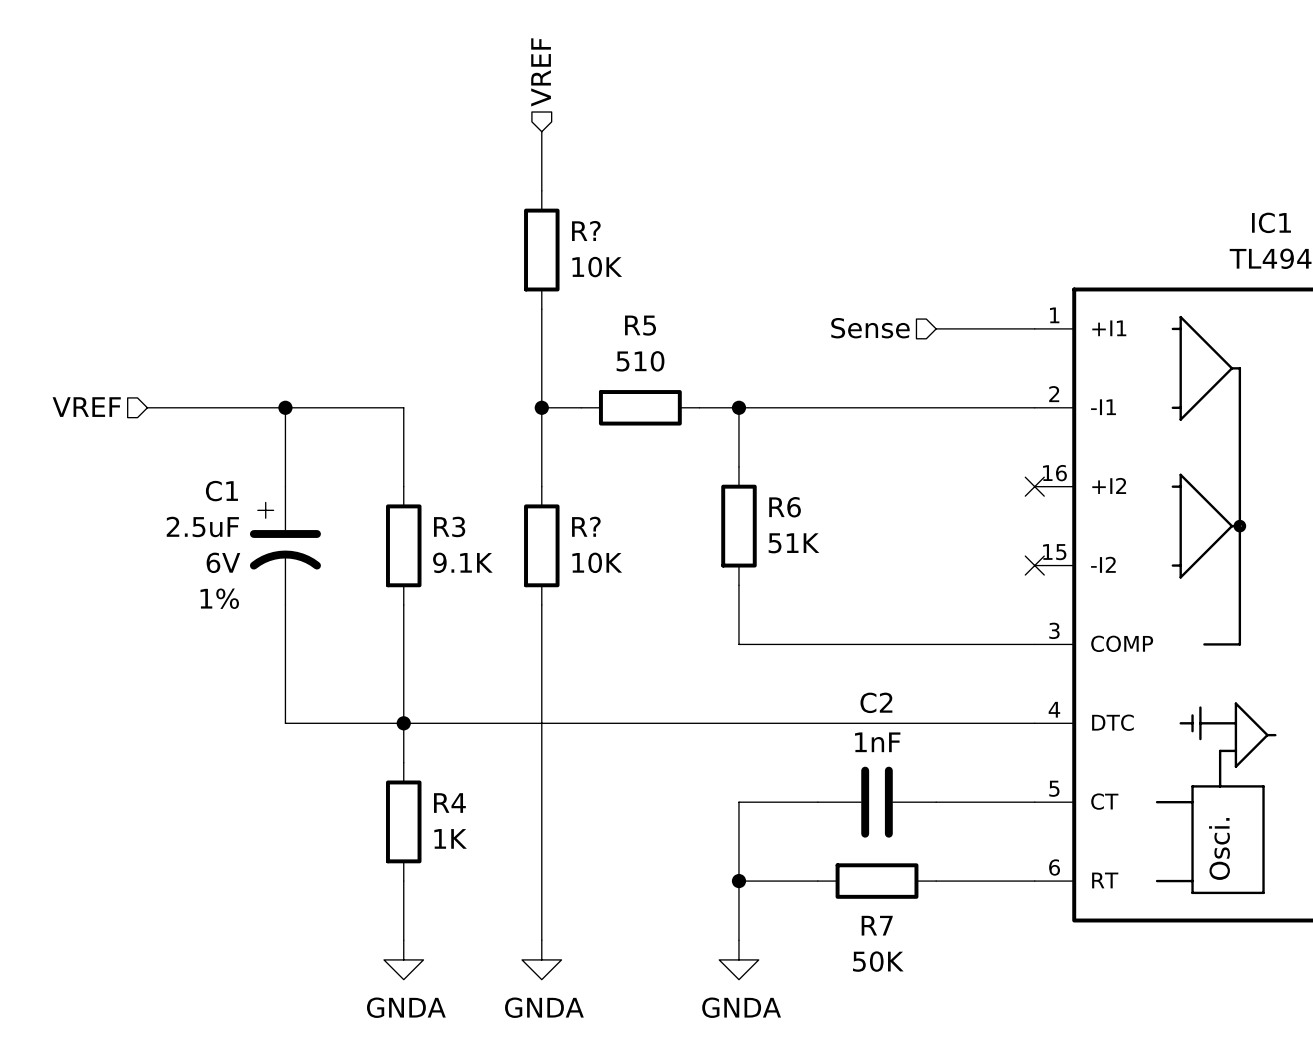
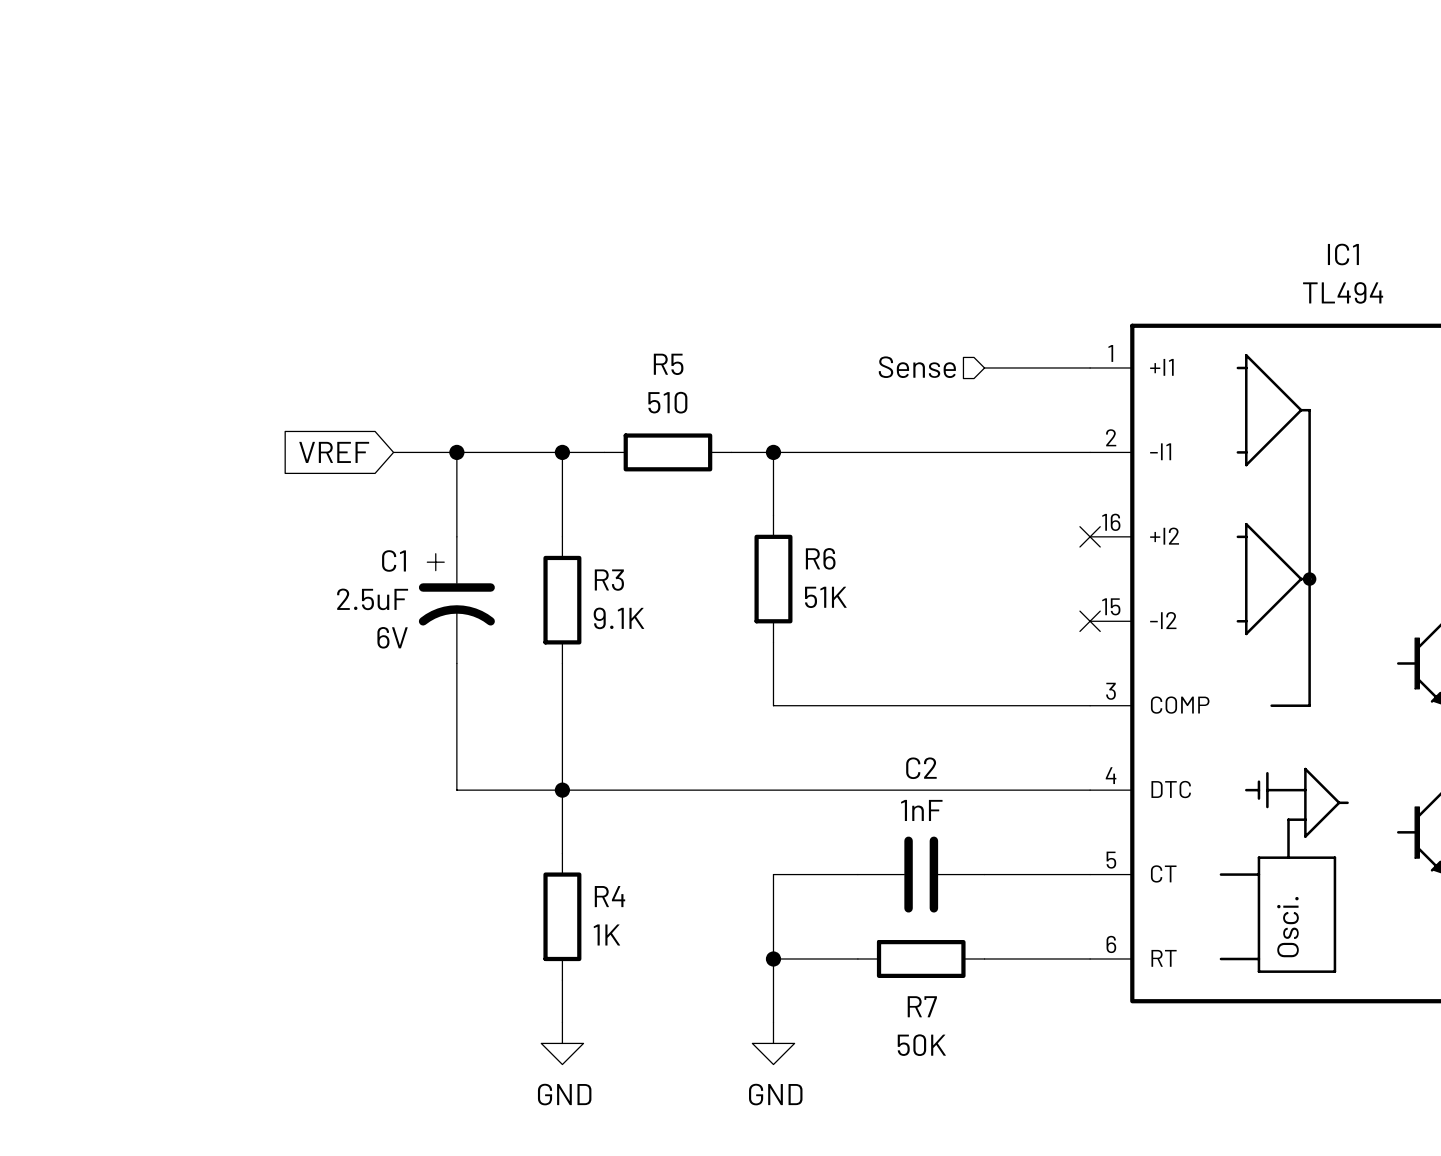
hierarchical label: VREF (541, 72) -> none
wire: (541, 131) (541, 190) -> none
R?: 10K (541, 250) -> none
wire: (541, 309) (541, 407) -> none
hierarchical label: VREF (86, 407) -> none
wire: (147, 407) (384, 407) -> none
wire: (285, 407) (285, 486) -> (456, 452) (456, 536)
junction: (285, 407) -> none
global label: none -> VREF (334, 452)
wire: (403, 407) (403, 486) -> (414, 452) (562, 452)
junction: none -> (456, 452)
C1 name position: C1 (221, 491) -> C1 (394, 560)
C1 value position: 2.5uF (202, 526) -> 2.5uF (372, 599)
R? name: R? (586, 526) -> R3 (609, 580)
C1 position: (285, 545) -> (456, 600)
R3: 9.1K (403, 545) -> none
C1 text: 6V (223, 562) -> none
R? value: 10K (597, 562) -> 9.1K (618, 618)
C1 text: none -> 6V (392, 637)
C1 text: 1% (219, 598) -> none
wire: (285, 604) (285, 723) (443, 723) -> (456, 663) (456, 790)
wire: (403, 604) (403, 762) -> none
junction: (403, 723) -> none
junction: none -> (562, 790)
wire: (541, 782) (541, 900) -> none
R4 position: (403, 821) -> (562, 916)
wire: (403, 881) (403, 940) -> none
power symbol: GNDA (403, 959) -> none
power symbol: GNDA (541, 959) -> GND (562, 1043)
power symbol: GNDA (738, 959) -> GND (773, 1043)

